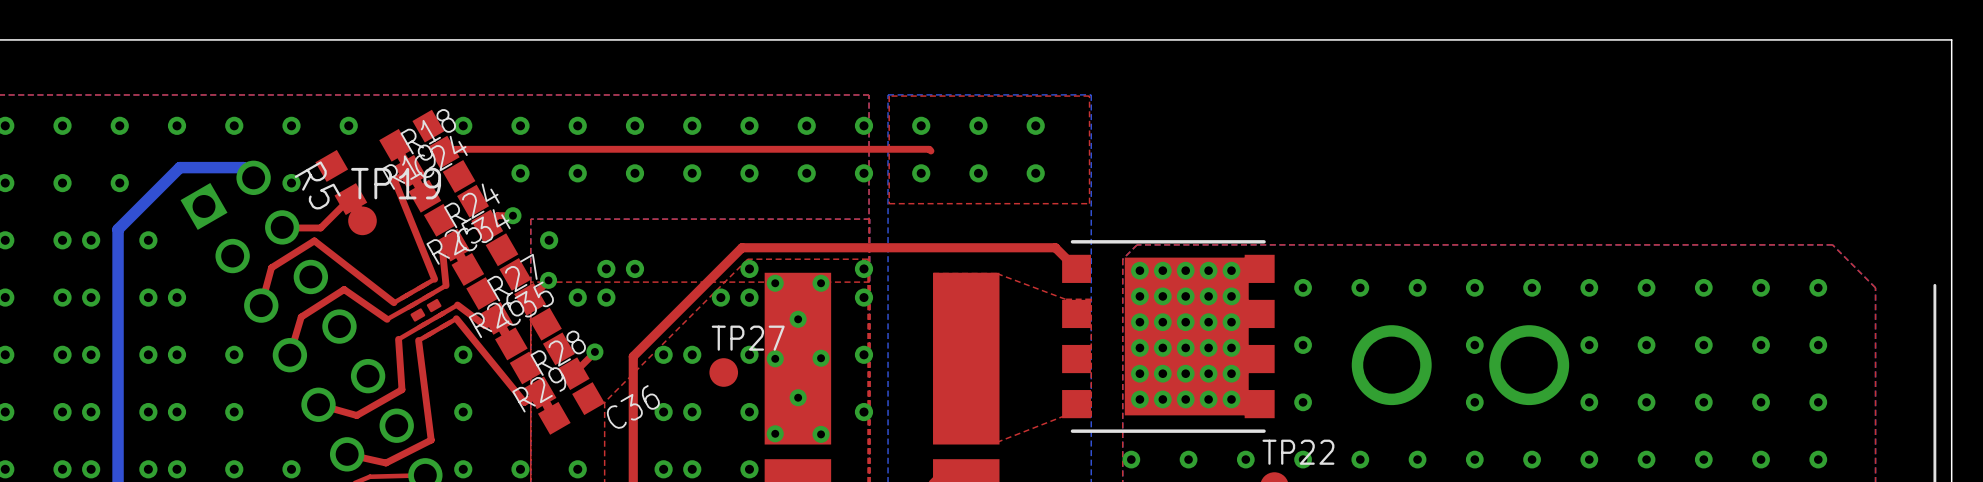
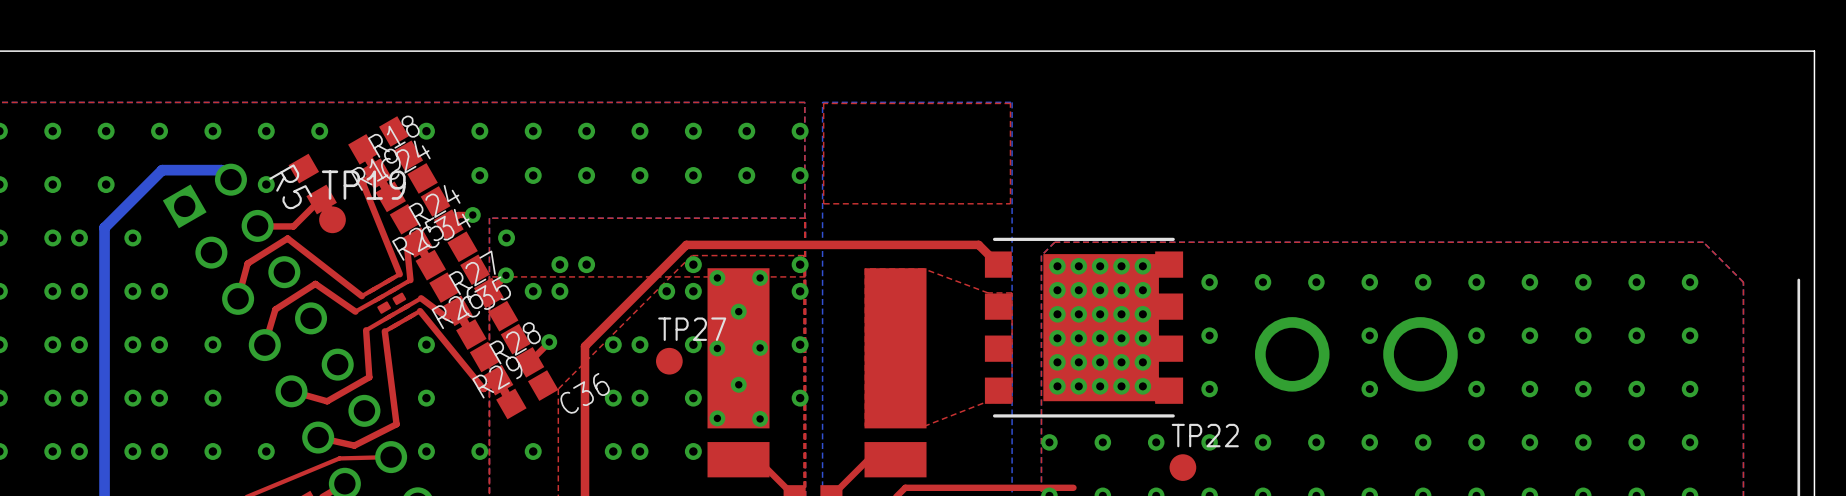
via: (921, 125) -> none
via: (978, 125) -> none
via: (1035, 125) -> none
top track: (930, 151) (929, 149) (455, 149) (452, 152) (443, 152) -> none
via: (921, 173) -> none
via: (978, 173) -> none
via: (1035, 173) -> none

